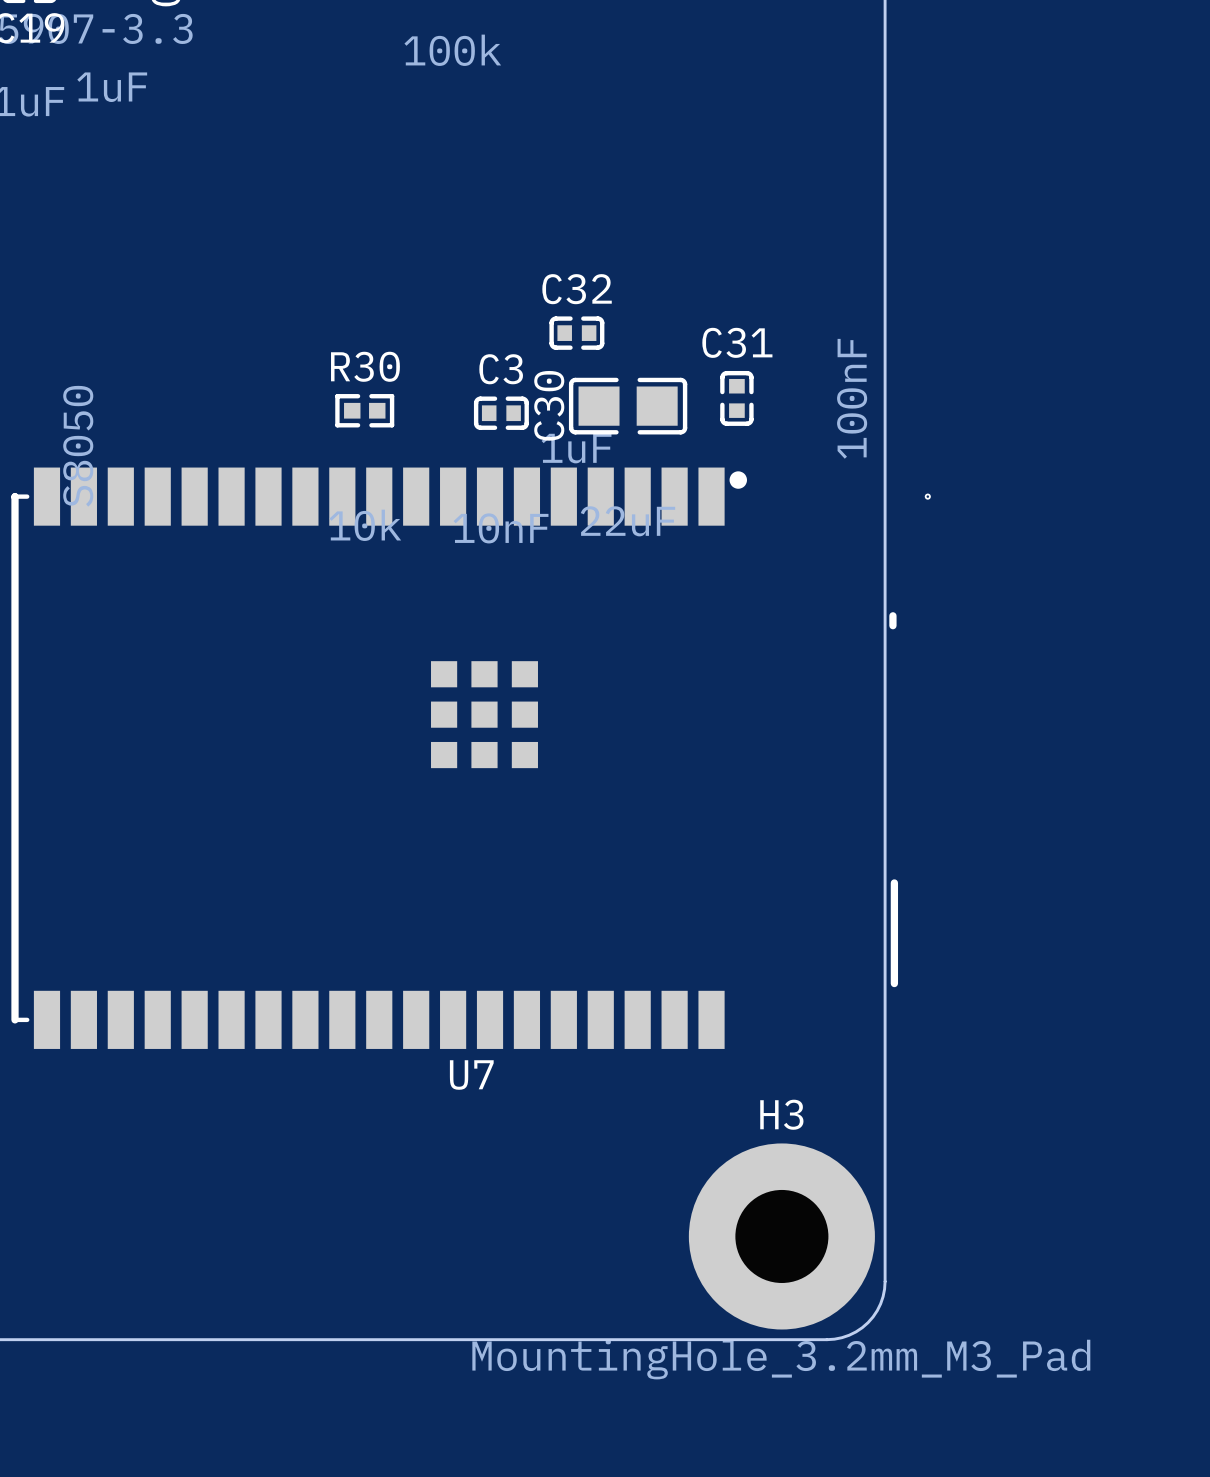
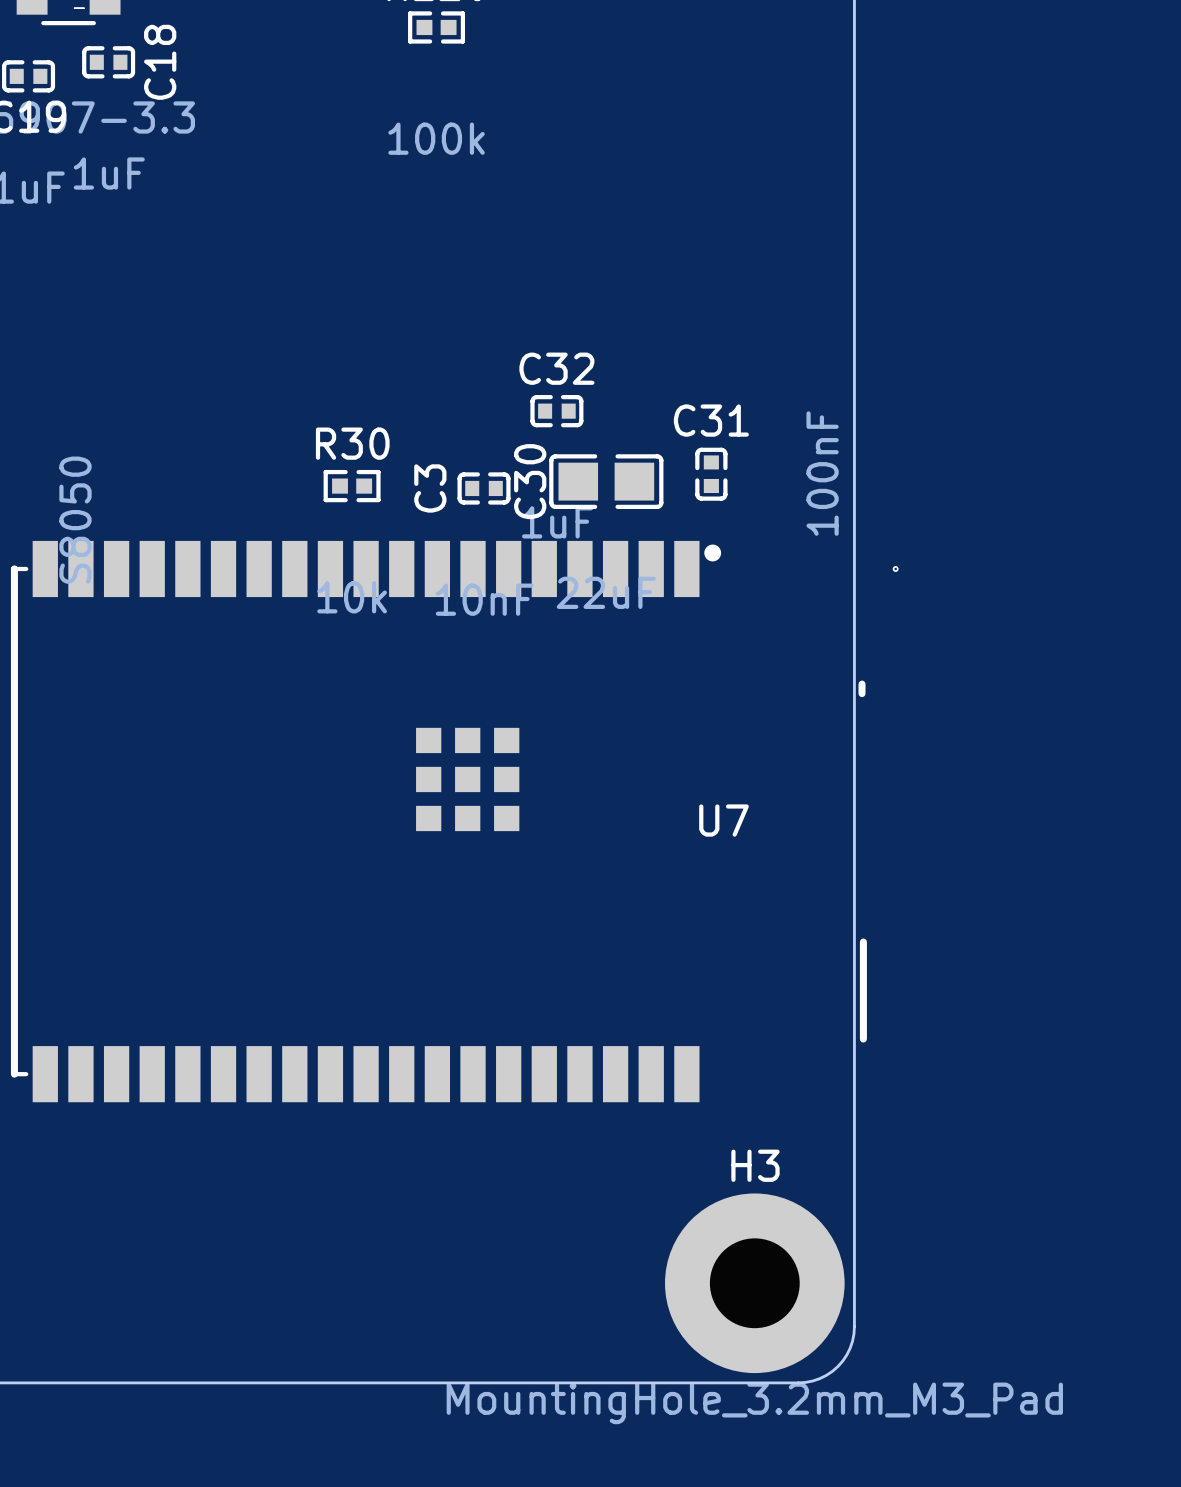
C3 name rotation: 0° (501, 369) -> 90° counterclockwise (430, 488)
U7 name position: U7 (471, 1075) -> U7 (724, 820)

